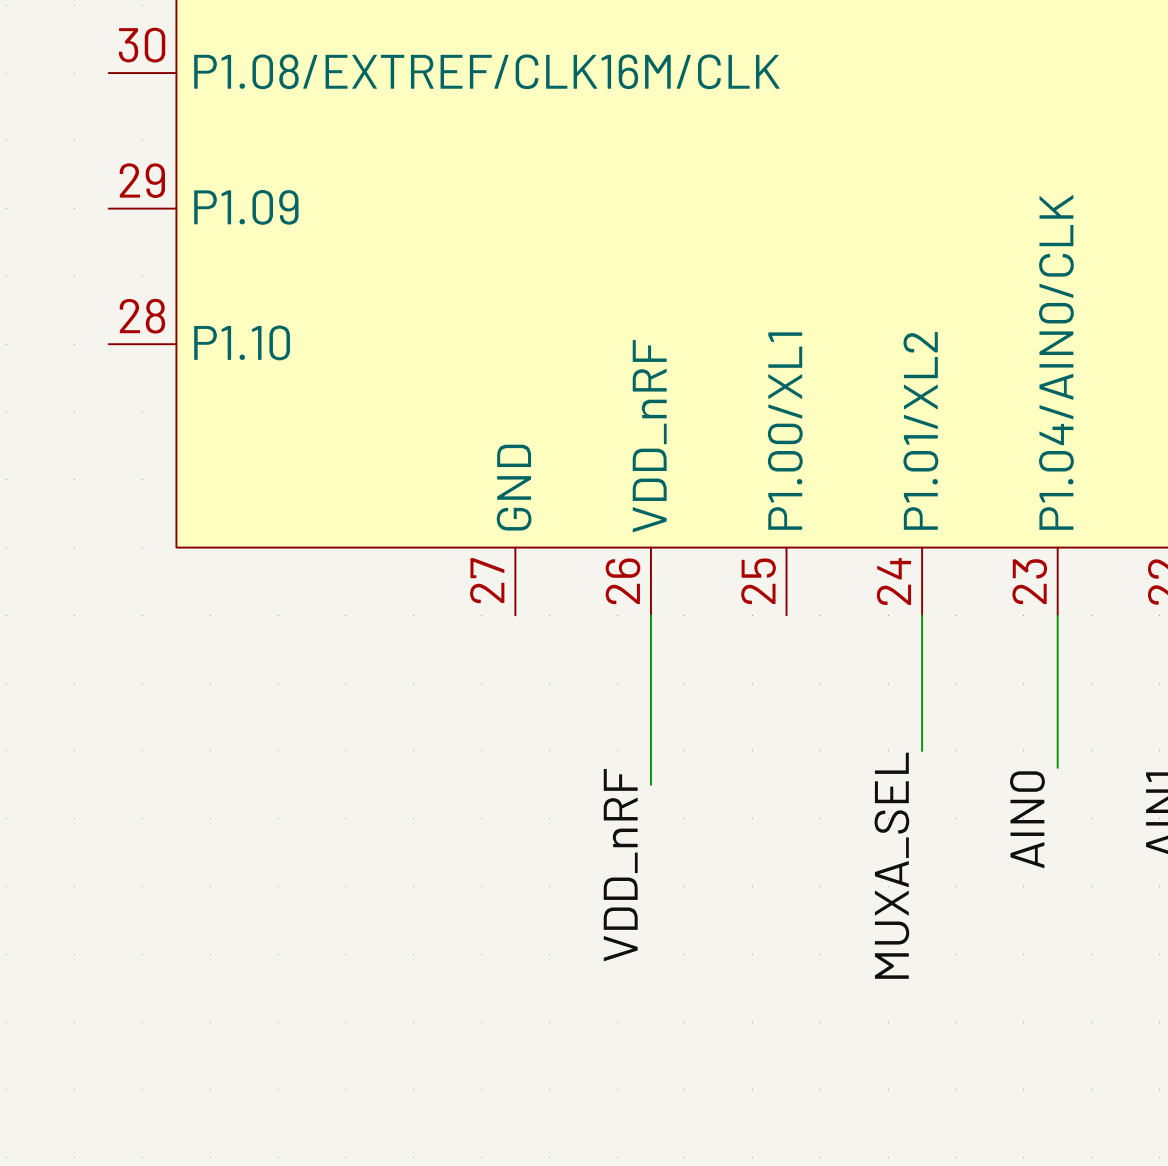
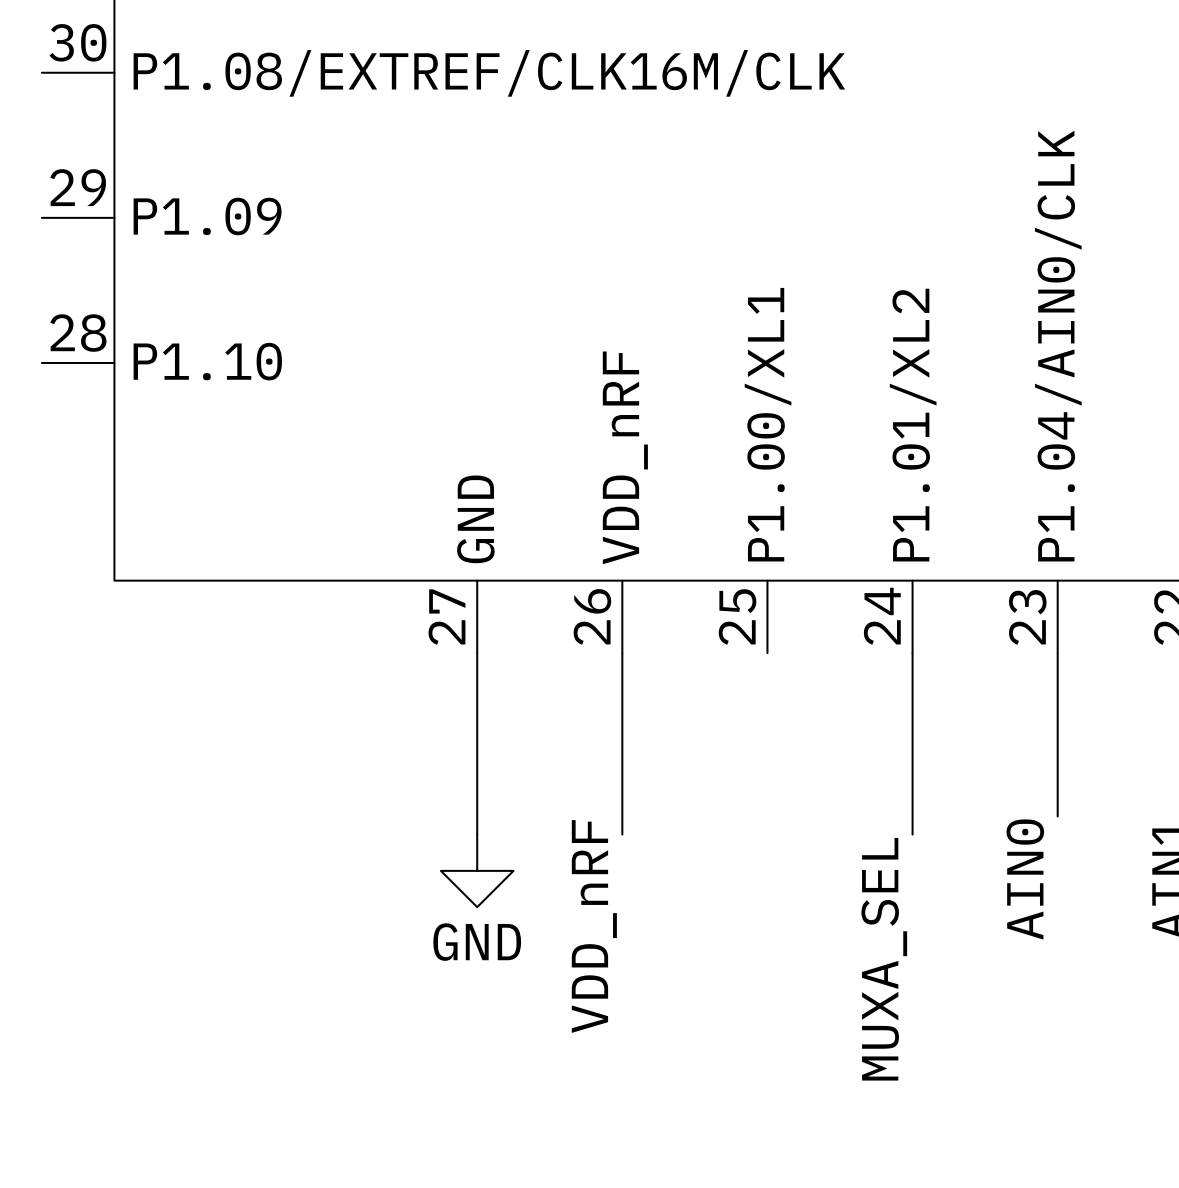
wire: none -> (477, 653) (477, 834)
wire: none -> (912, 798) (912, 834)
power symbol: none -> GND (477, 870)
label position: MUXA_SEL (891, 865) -> MUXA_SEL (884, 959)

